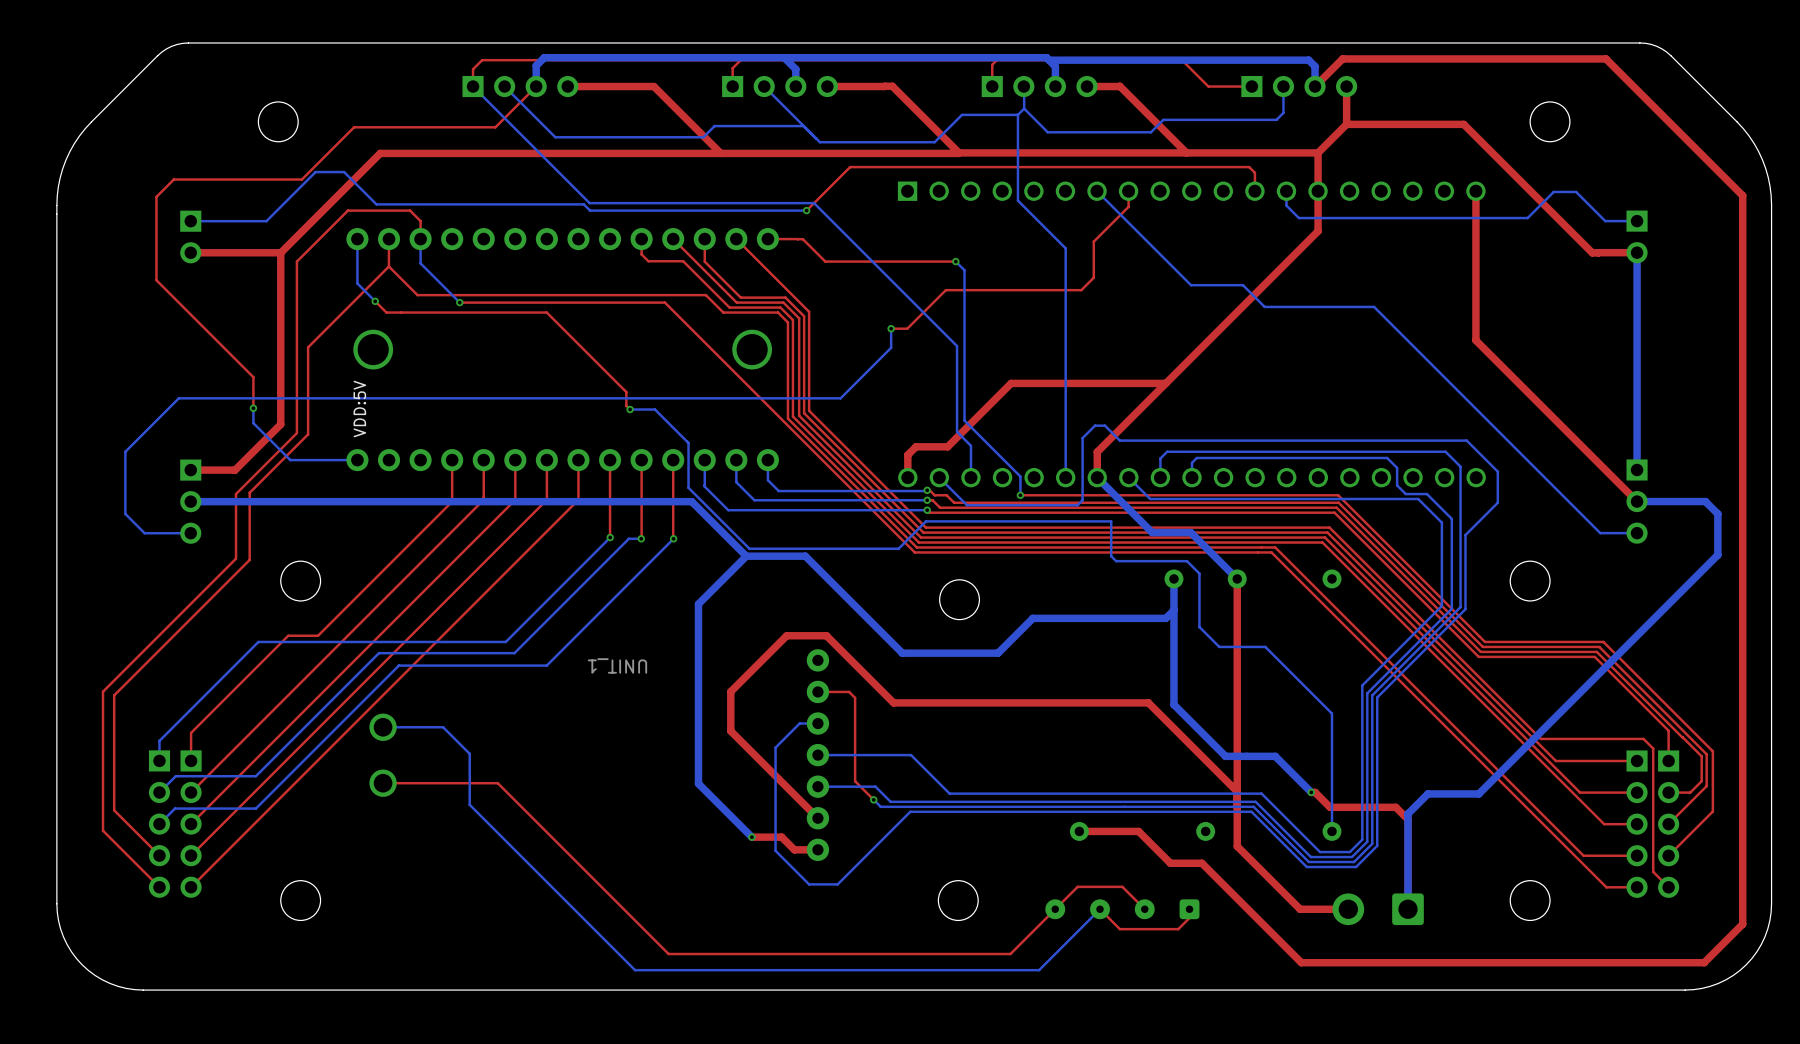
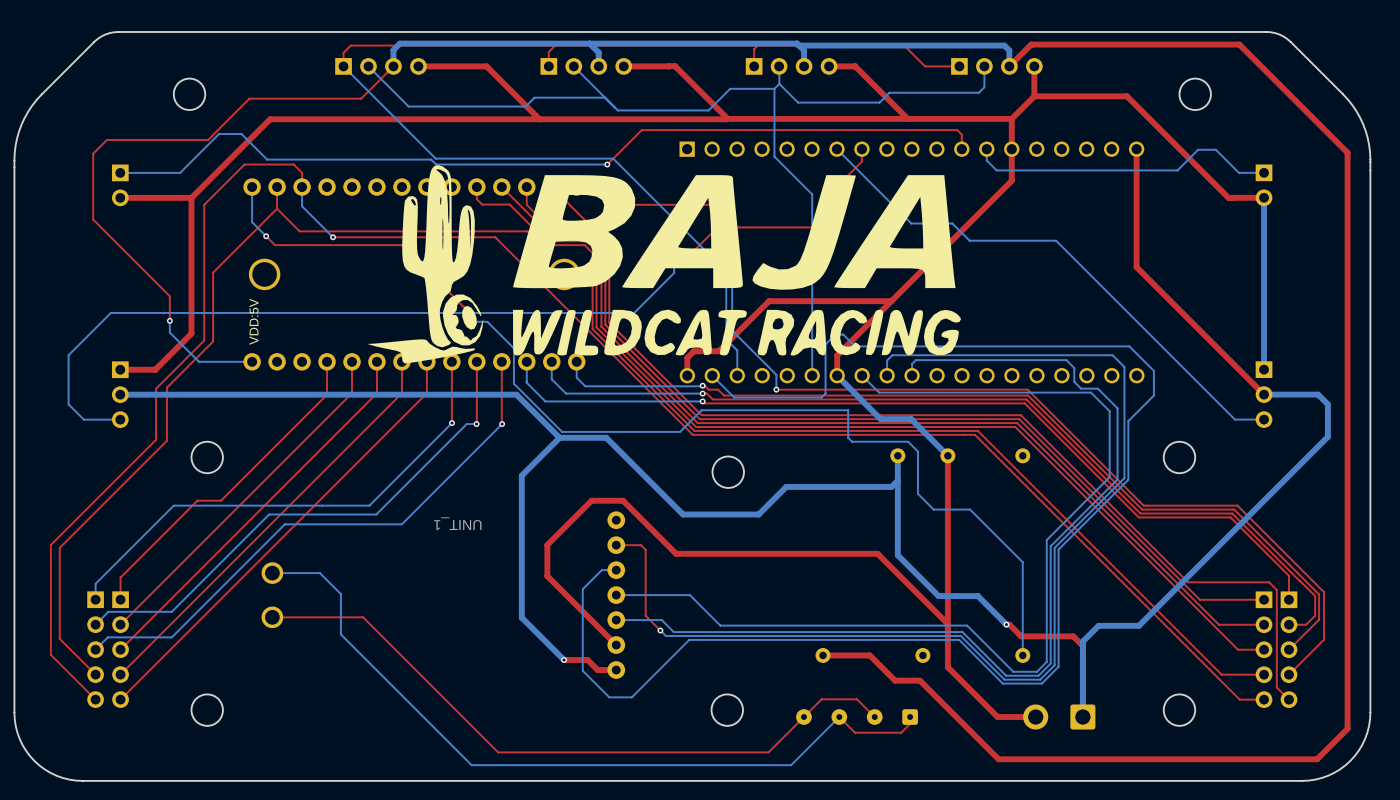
part: none -> (664, 264)

